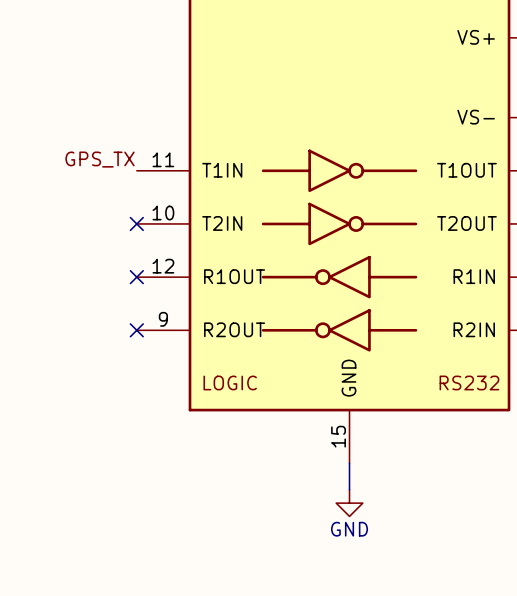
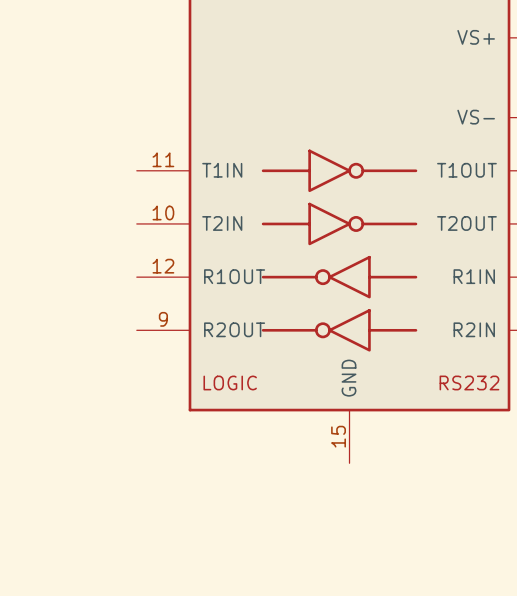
label: GPS_TX (100, 159) -> none
no-connect mark: (136, 223) -> none
no-connect mark: (136, 277) -> none
no-connect mark: (136, 330) -> none
wire: (349, 463) (349, 489) -> none
power symbol: GND (349, 503) -> none

